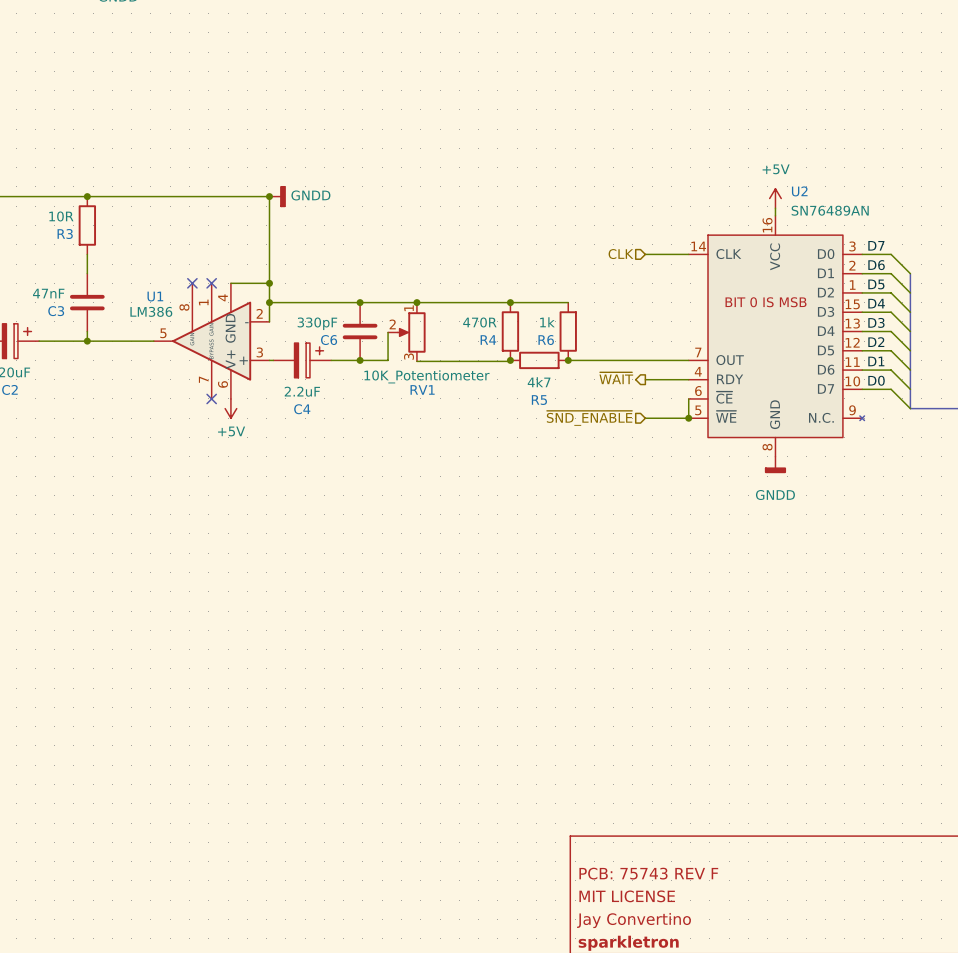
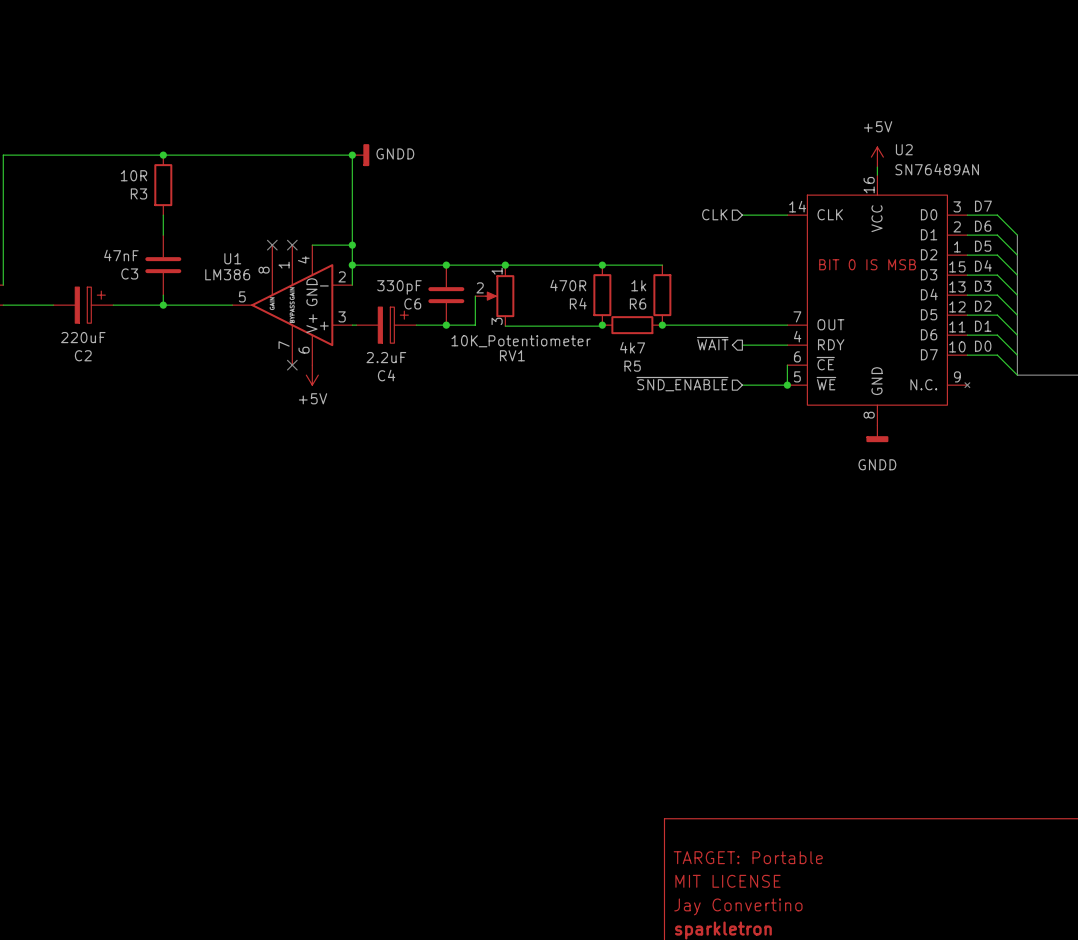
title block: PCB: 75743 REV F (648, 873) -> TARGET: Portable (748, 857)

